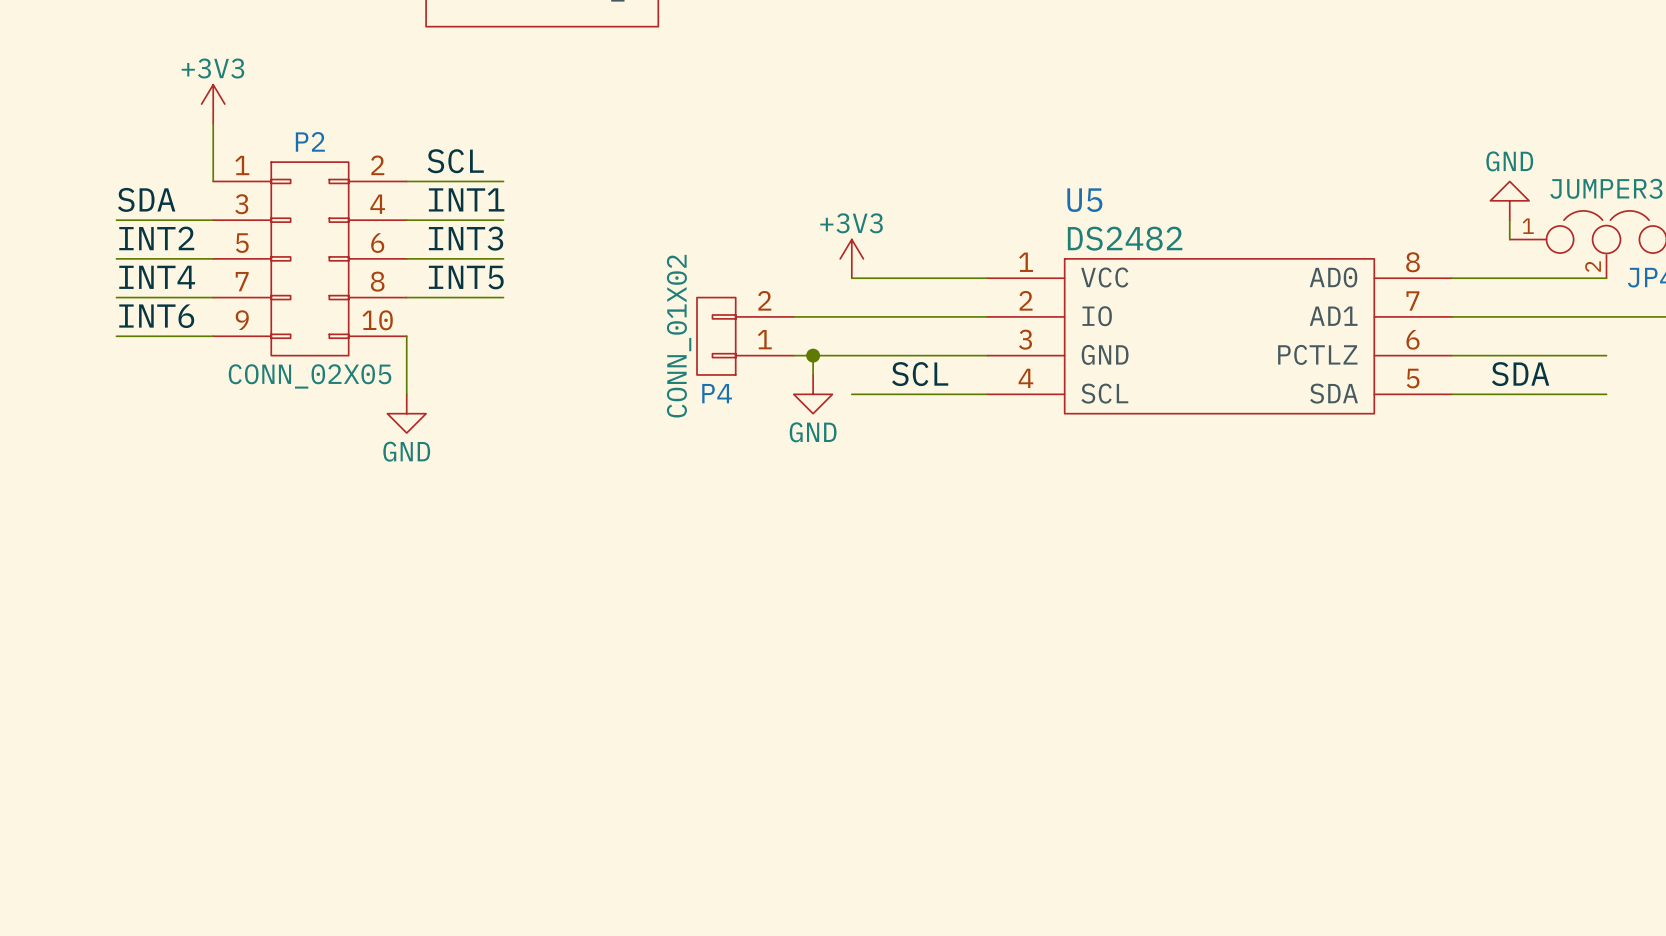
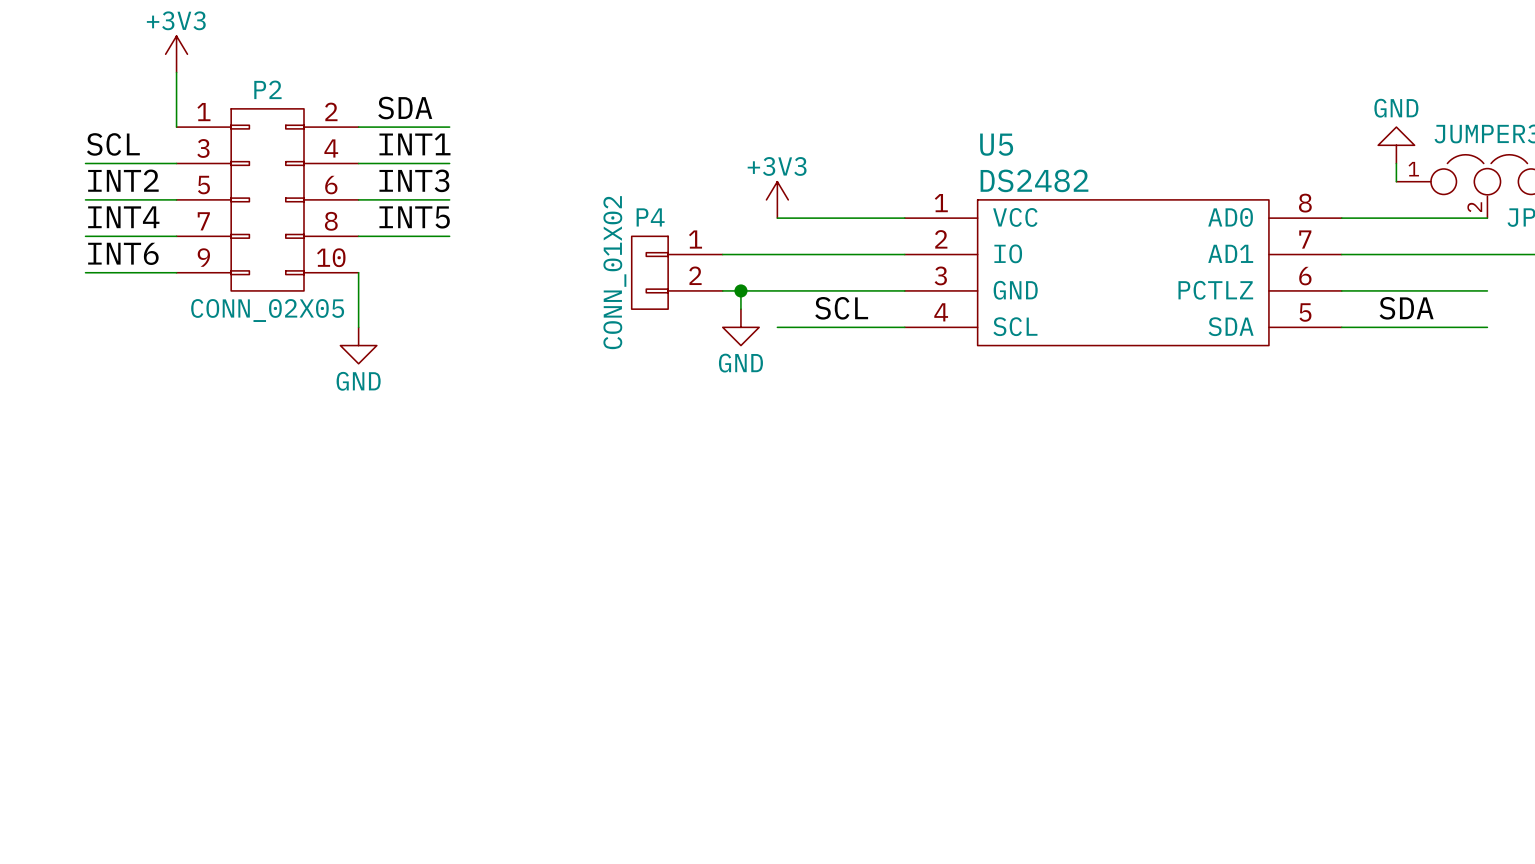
label: SCL (455, 161) -> SDA (405, 108)
label: SDA (146, 199) -> SCL (113, 144)
P4 flip: as is (716, 336) -> up-down (649, 272)

